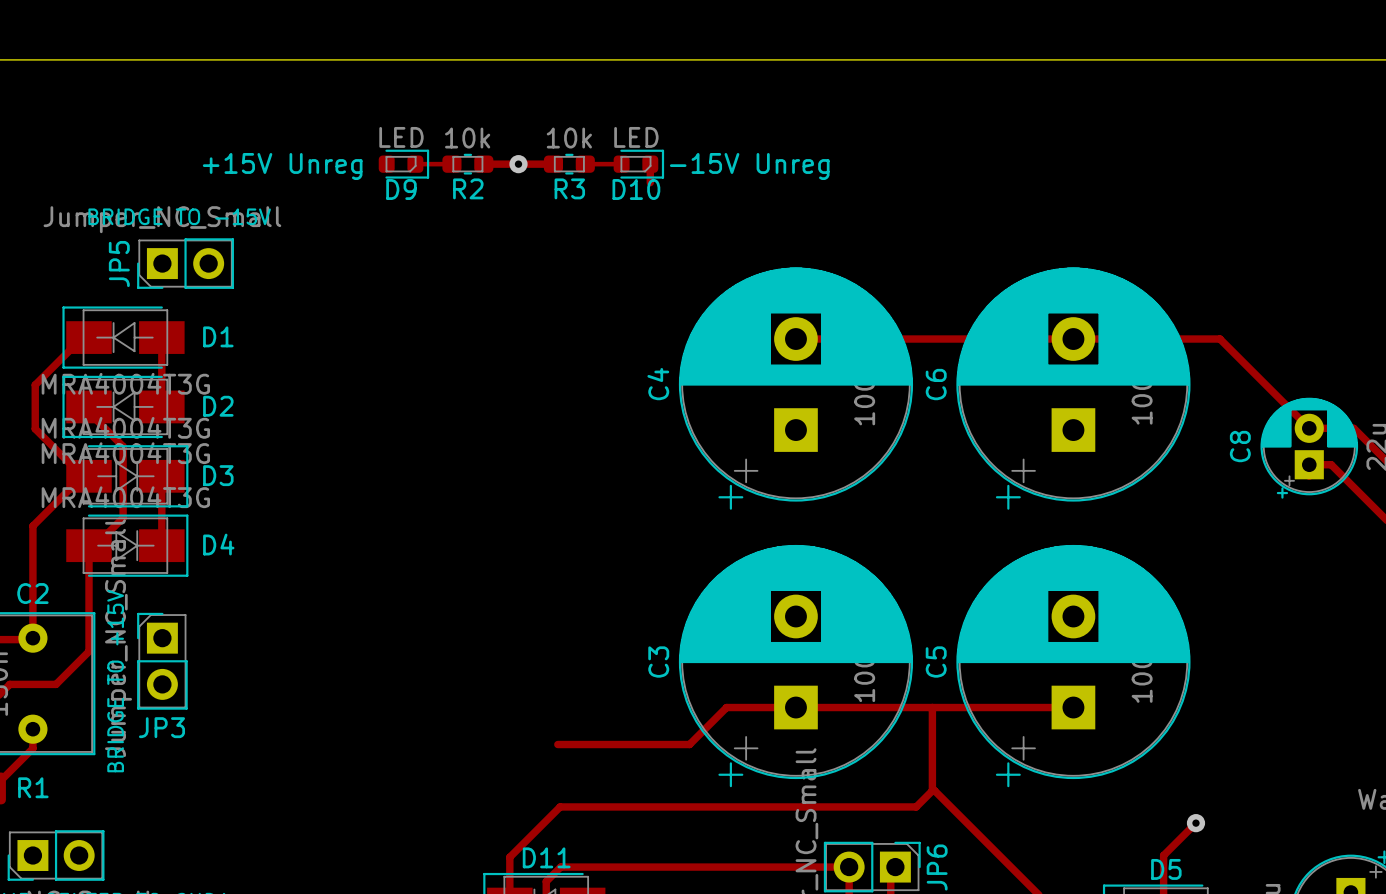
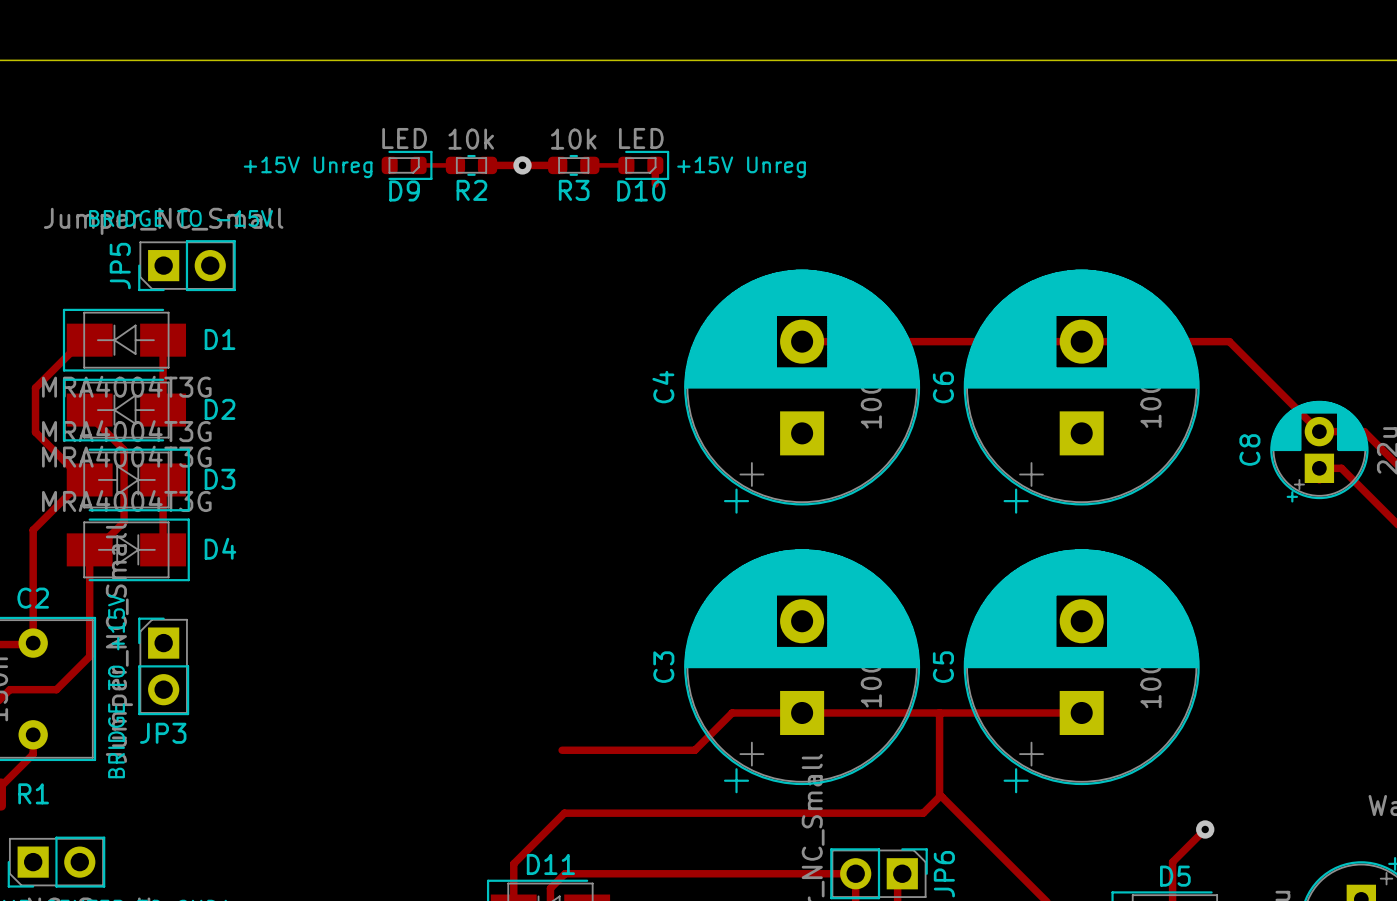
text: +15V Unreg (282, 166) -> none
D9 text: none -> +15V Unreg (308, 167)
D10 text: none -> +15V Unreg (741, 167)
text: -15V Unreg (749, 166) -> none

